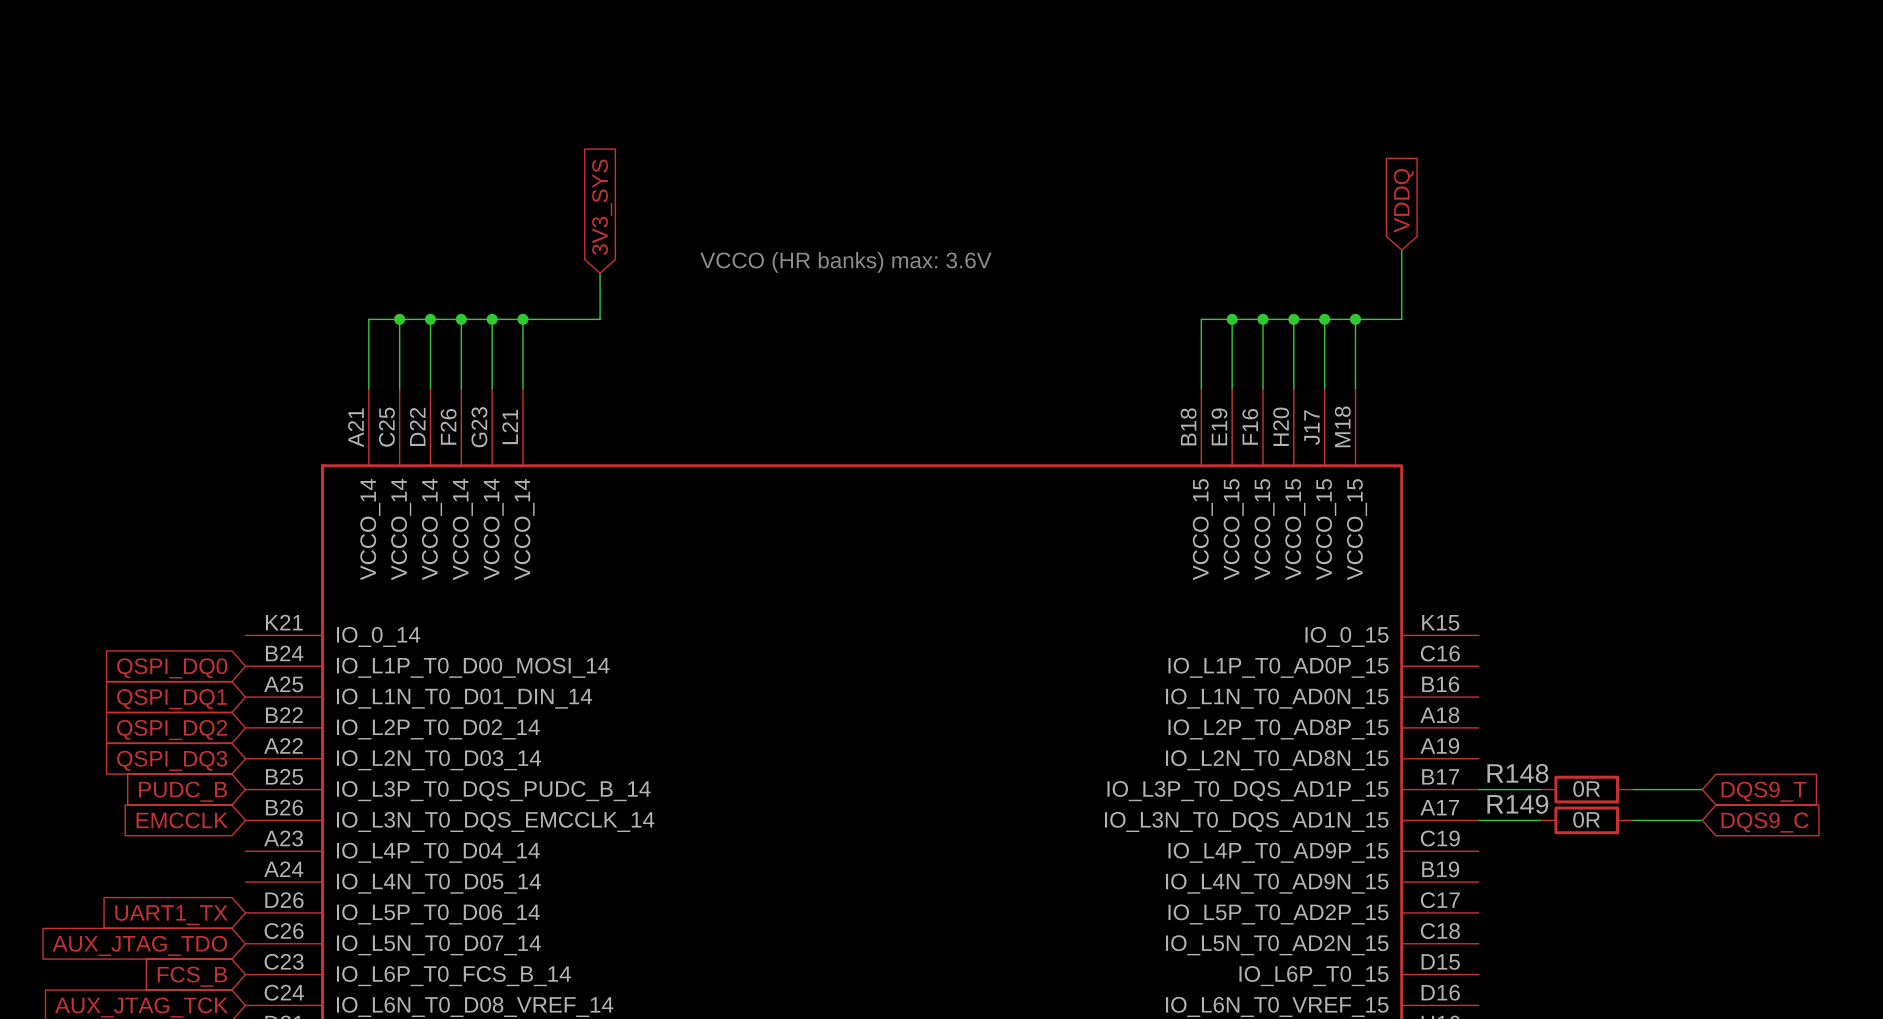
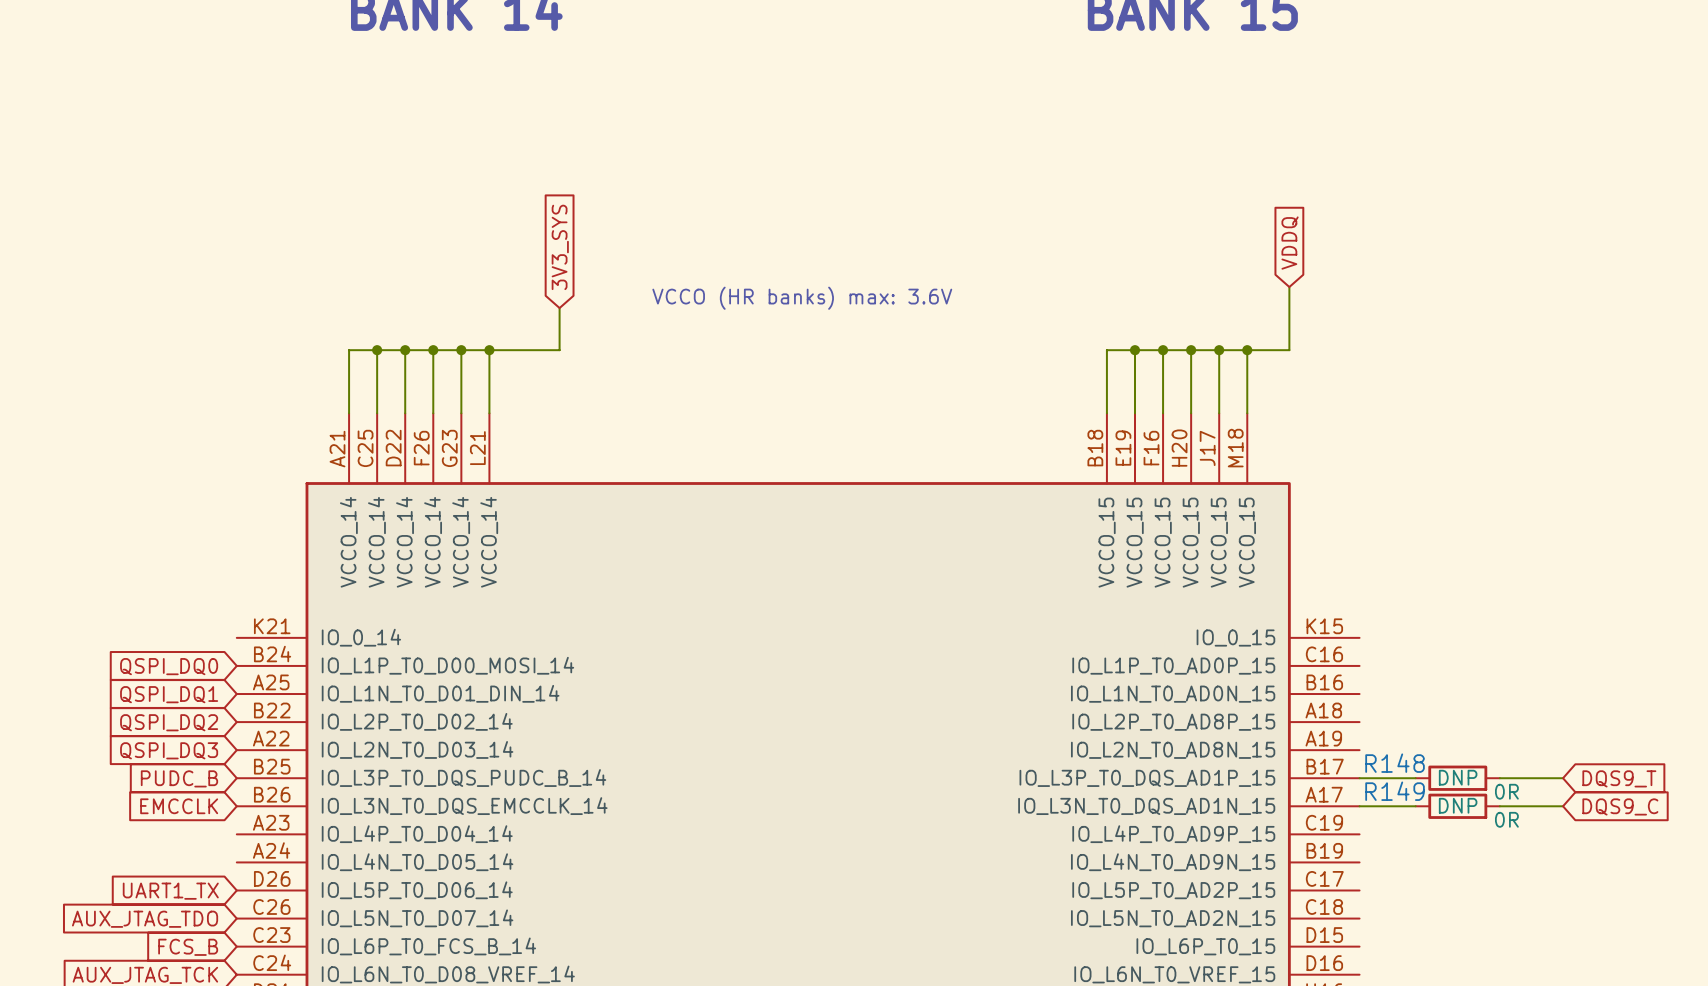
R148 text position: 0R (1586, 789) -> 0R (1506, 791)
R148 text: none -> DNP (1458, 777)
R149 text position: 0R (1586, 819) -> 0R (1506, 819)
R149 text: none -> DNP (1458, 805)

